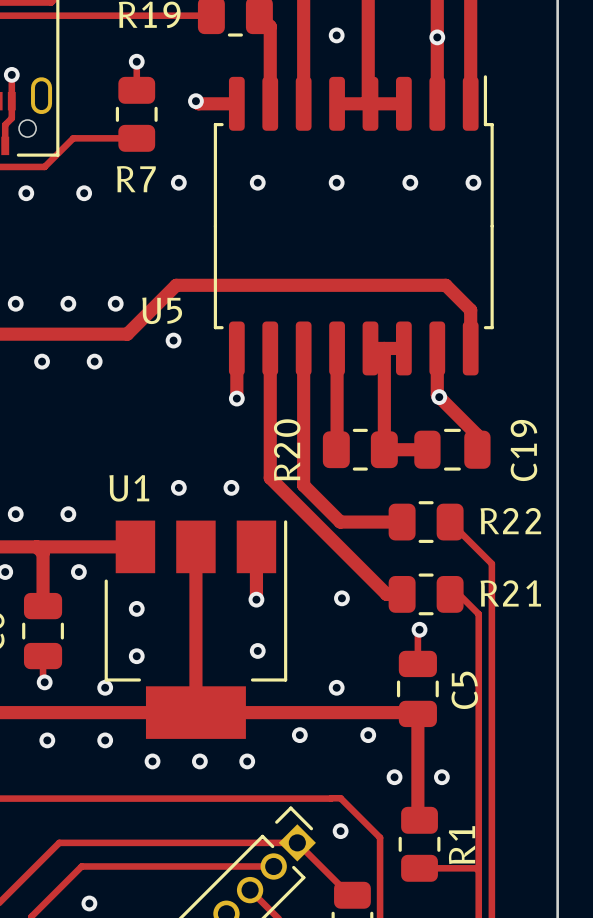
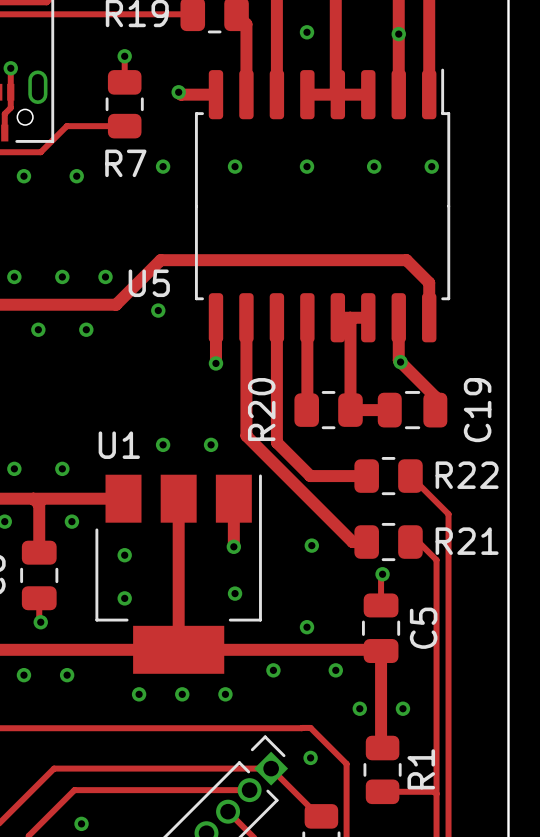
via: (105, 687) -> none
via: none -> (23, 675)
via: (47, 740) -> none
via: none -> (67, 675)
via: (105, 740) -> none

